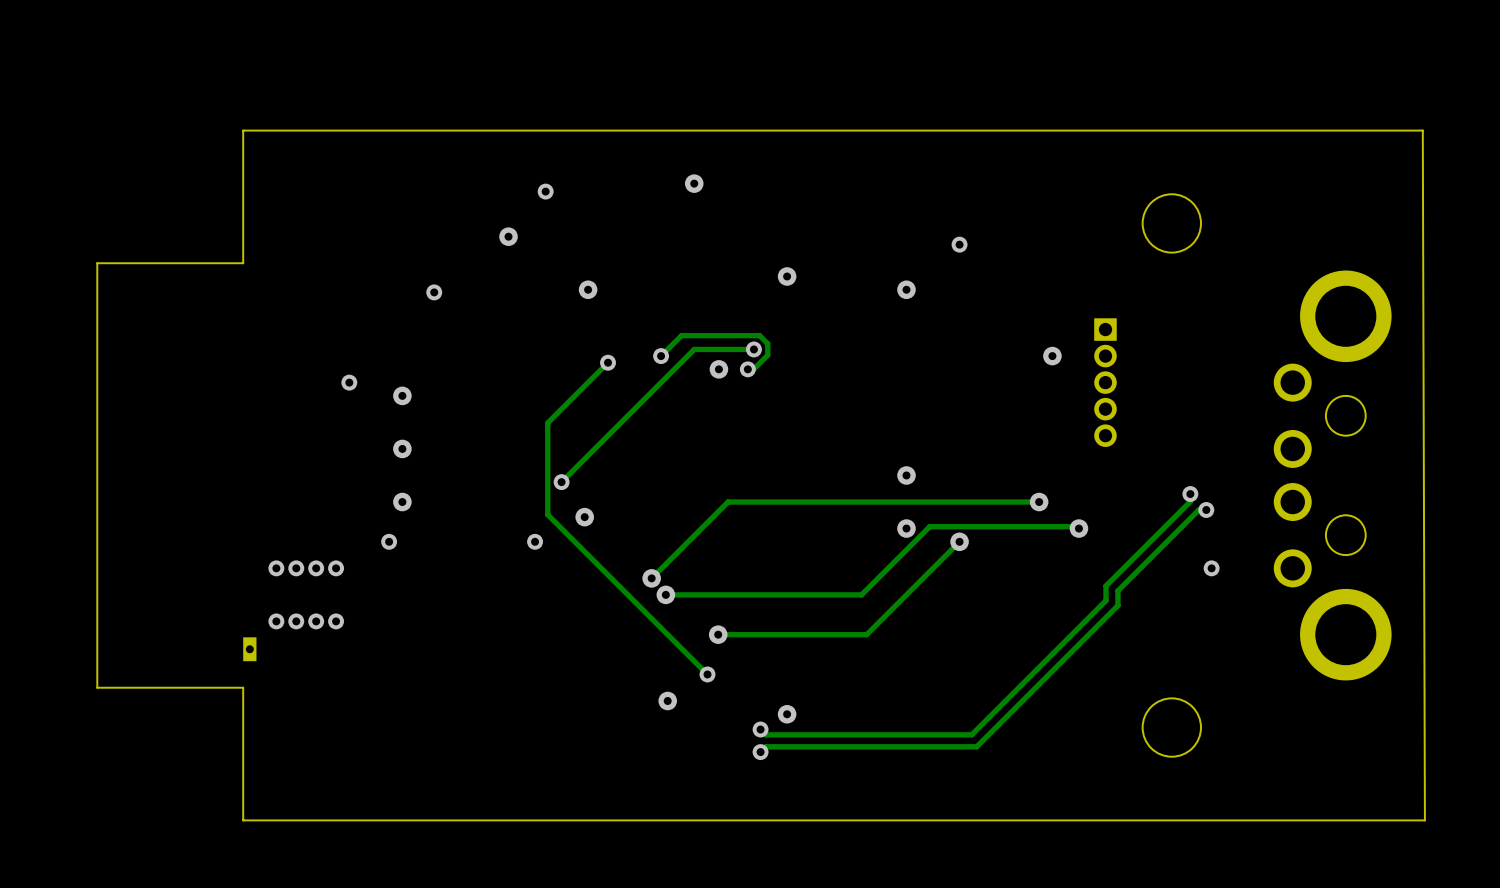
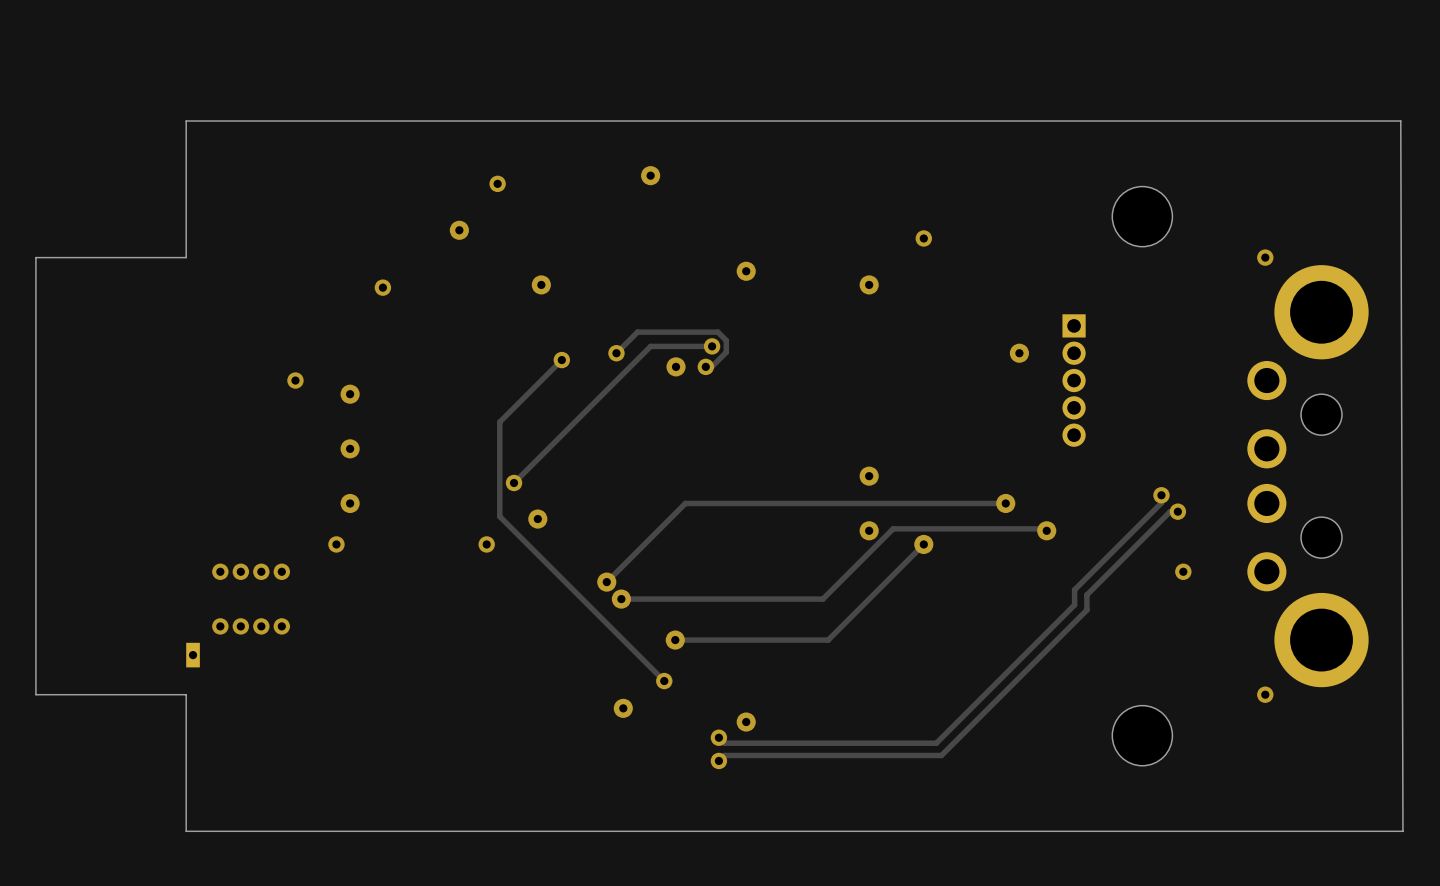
via: none -> (1265, 257)
via: none -> (1265, 694)

